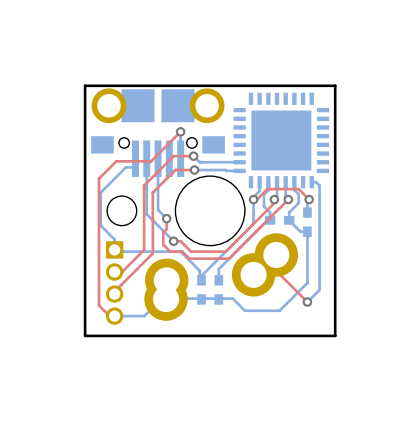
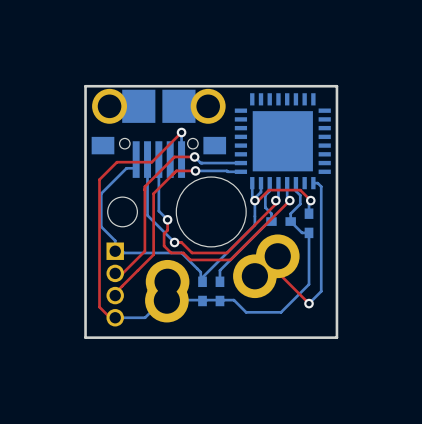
bottom track: none -> (252, 183) (252, 197) (254, 200)

